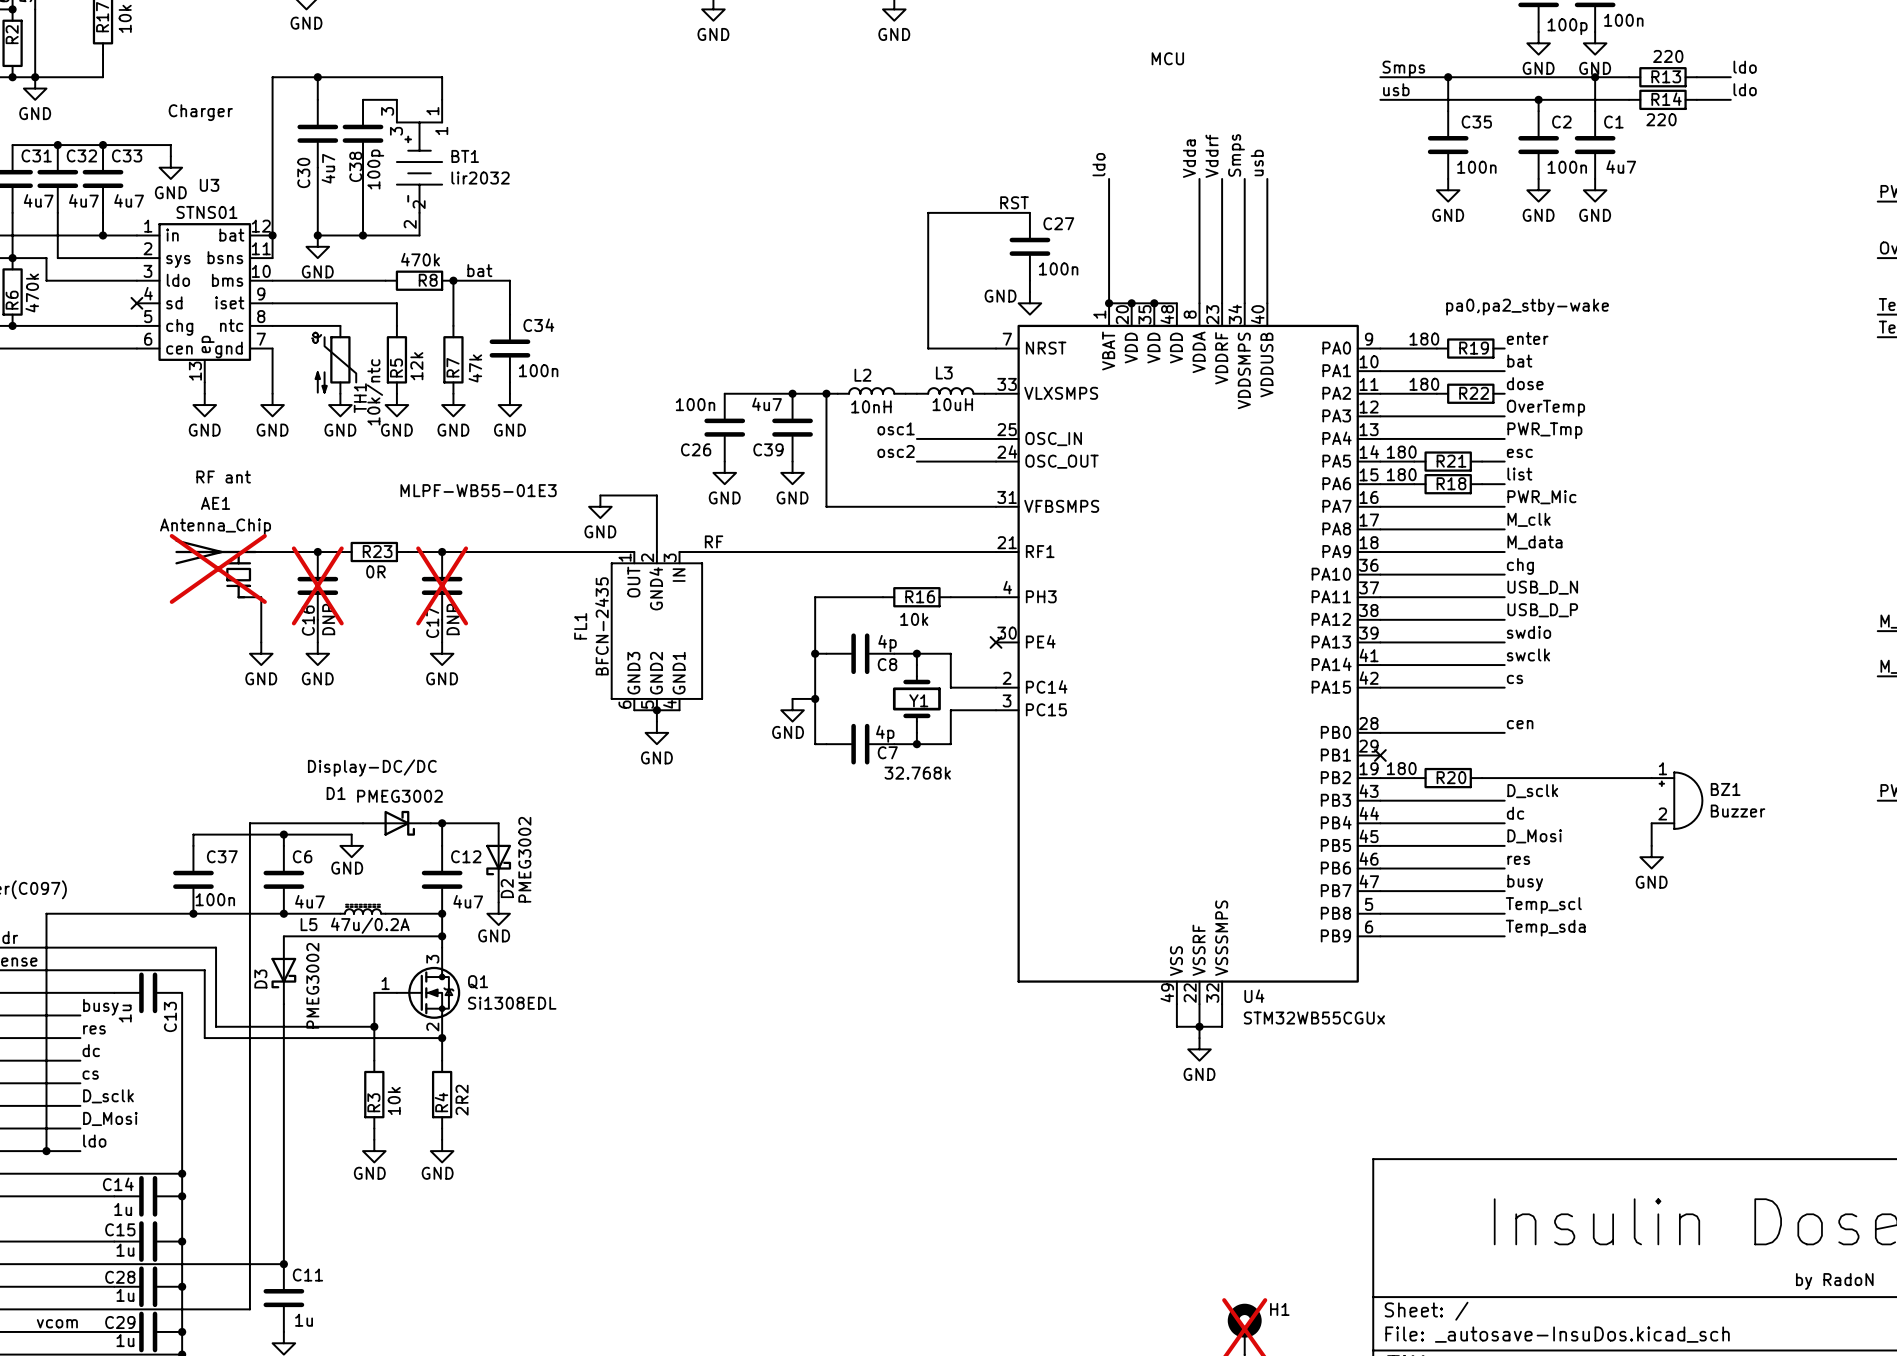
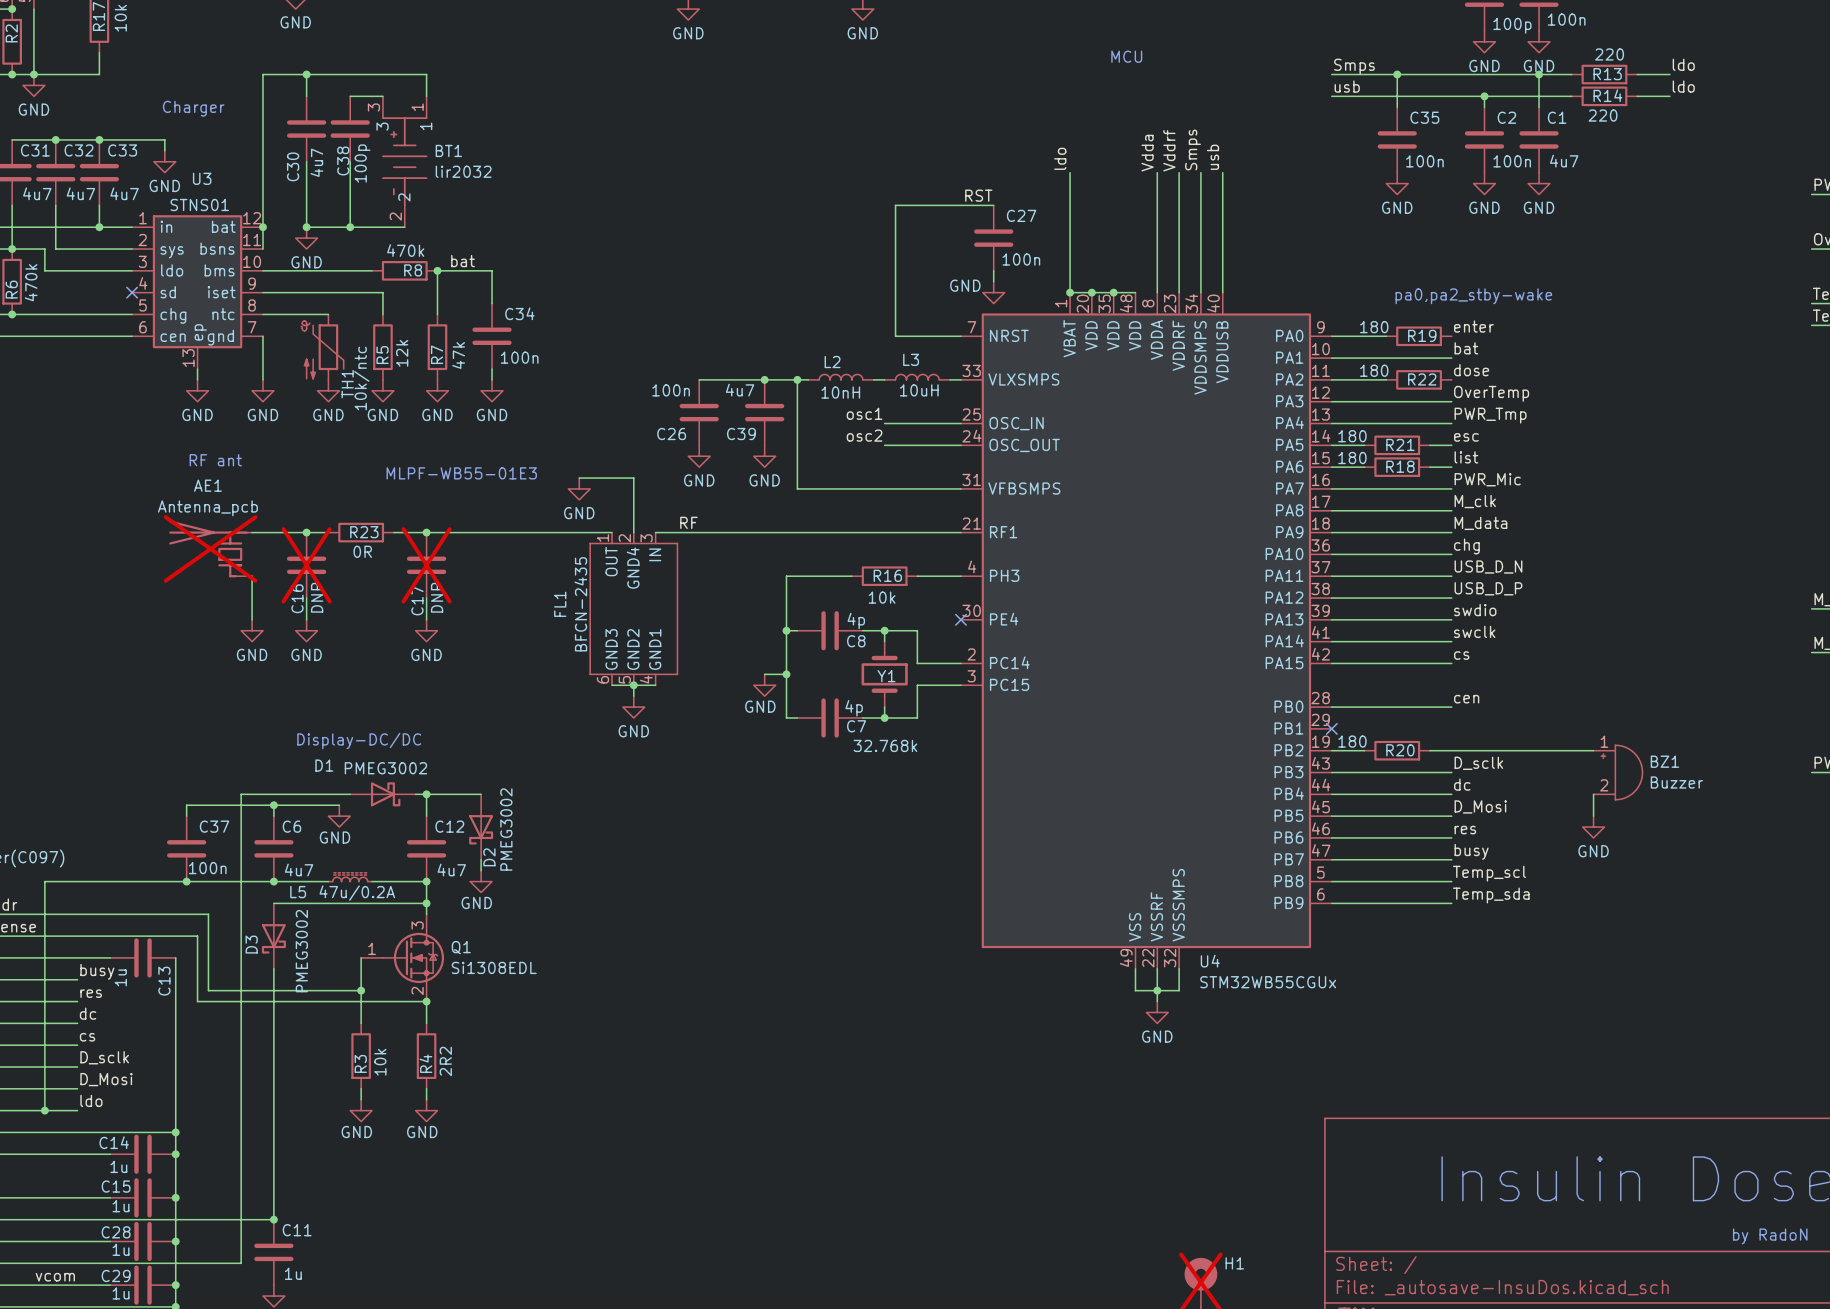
AE1 value: Antenna_Chip (215, 526) -> Antenna_pcb (207, 508)

